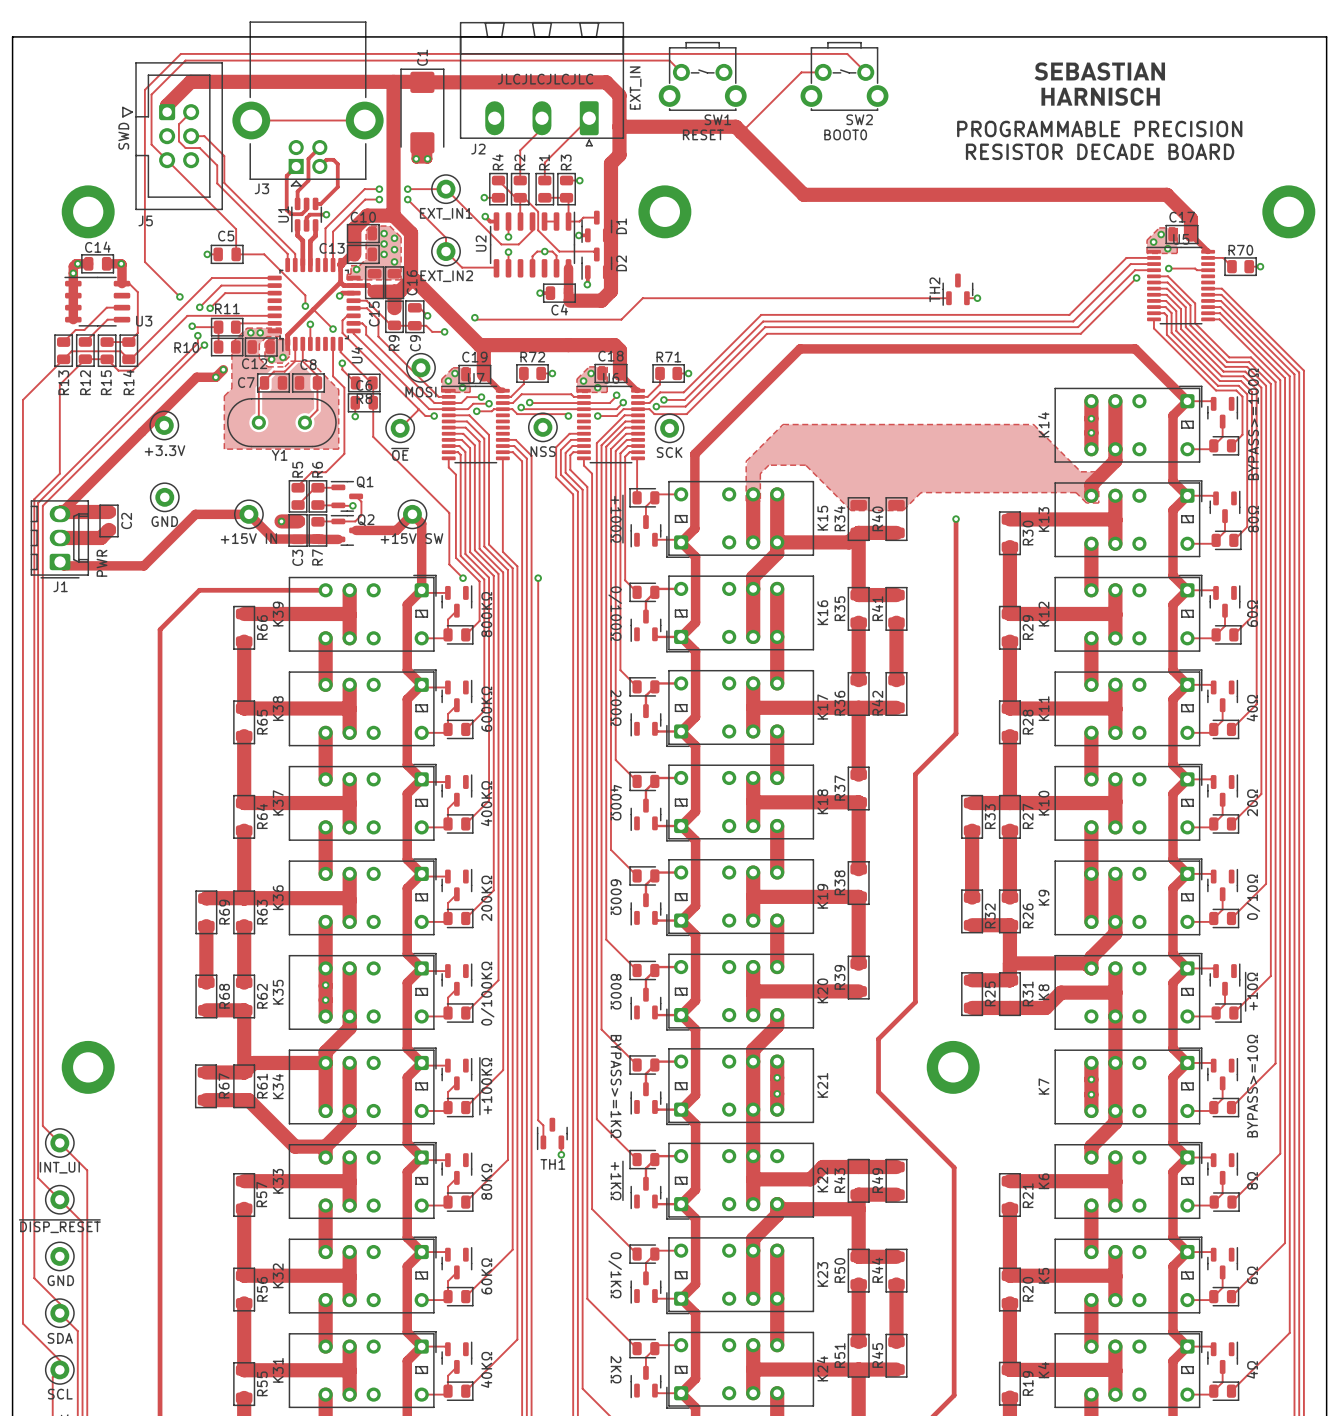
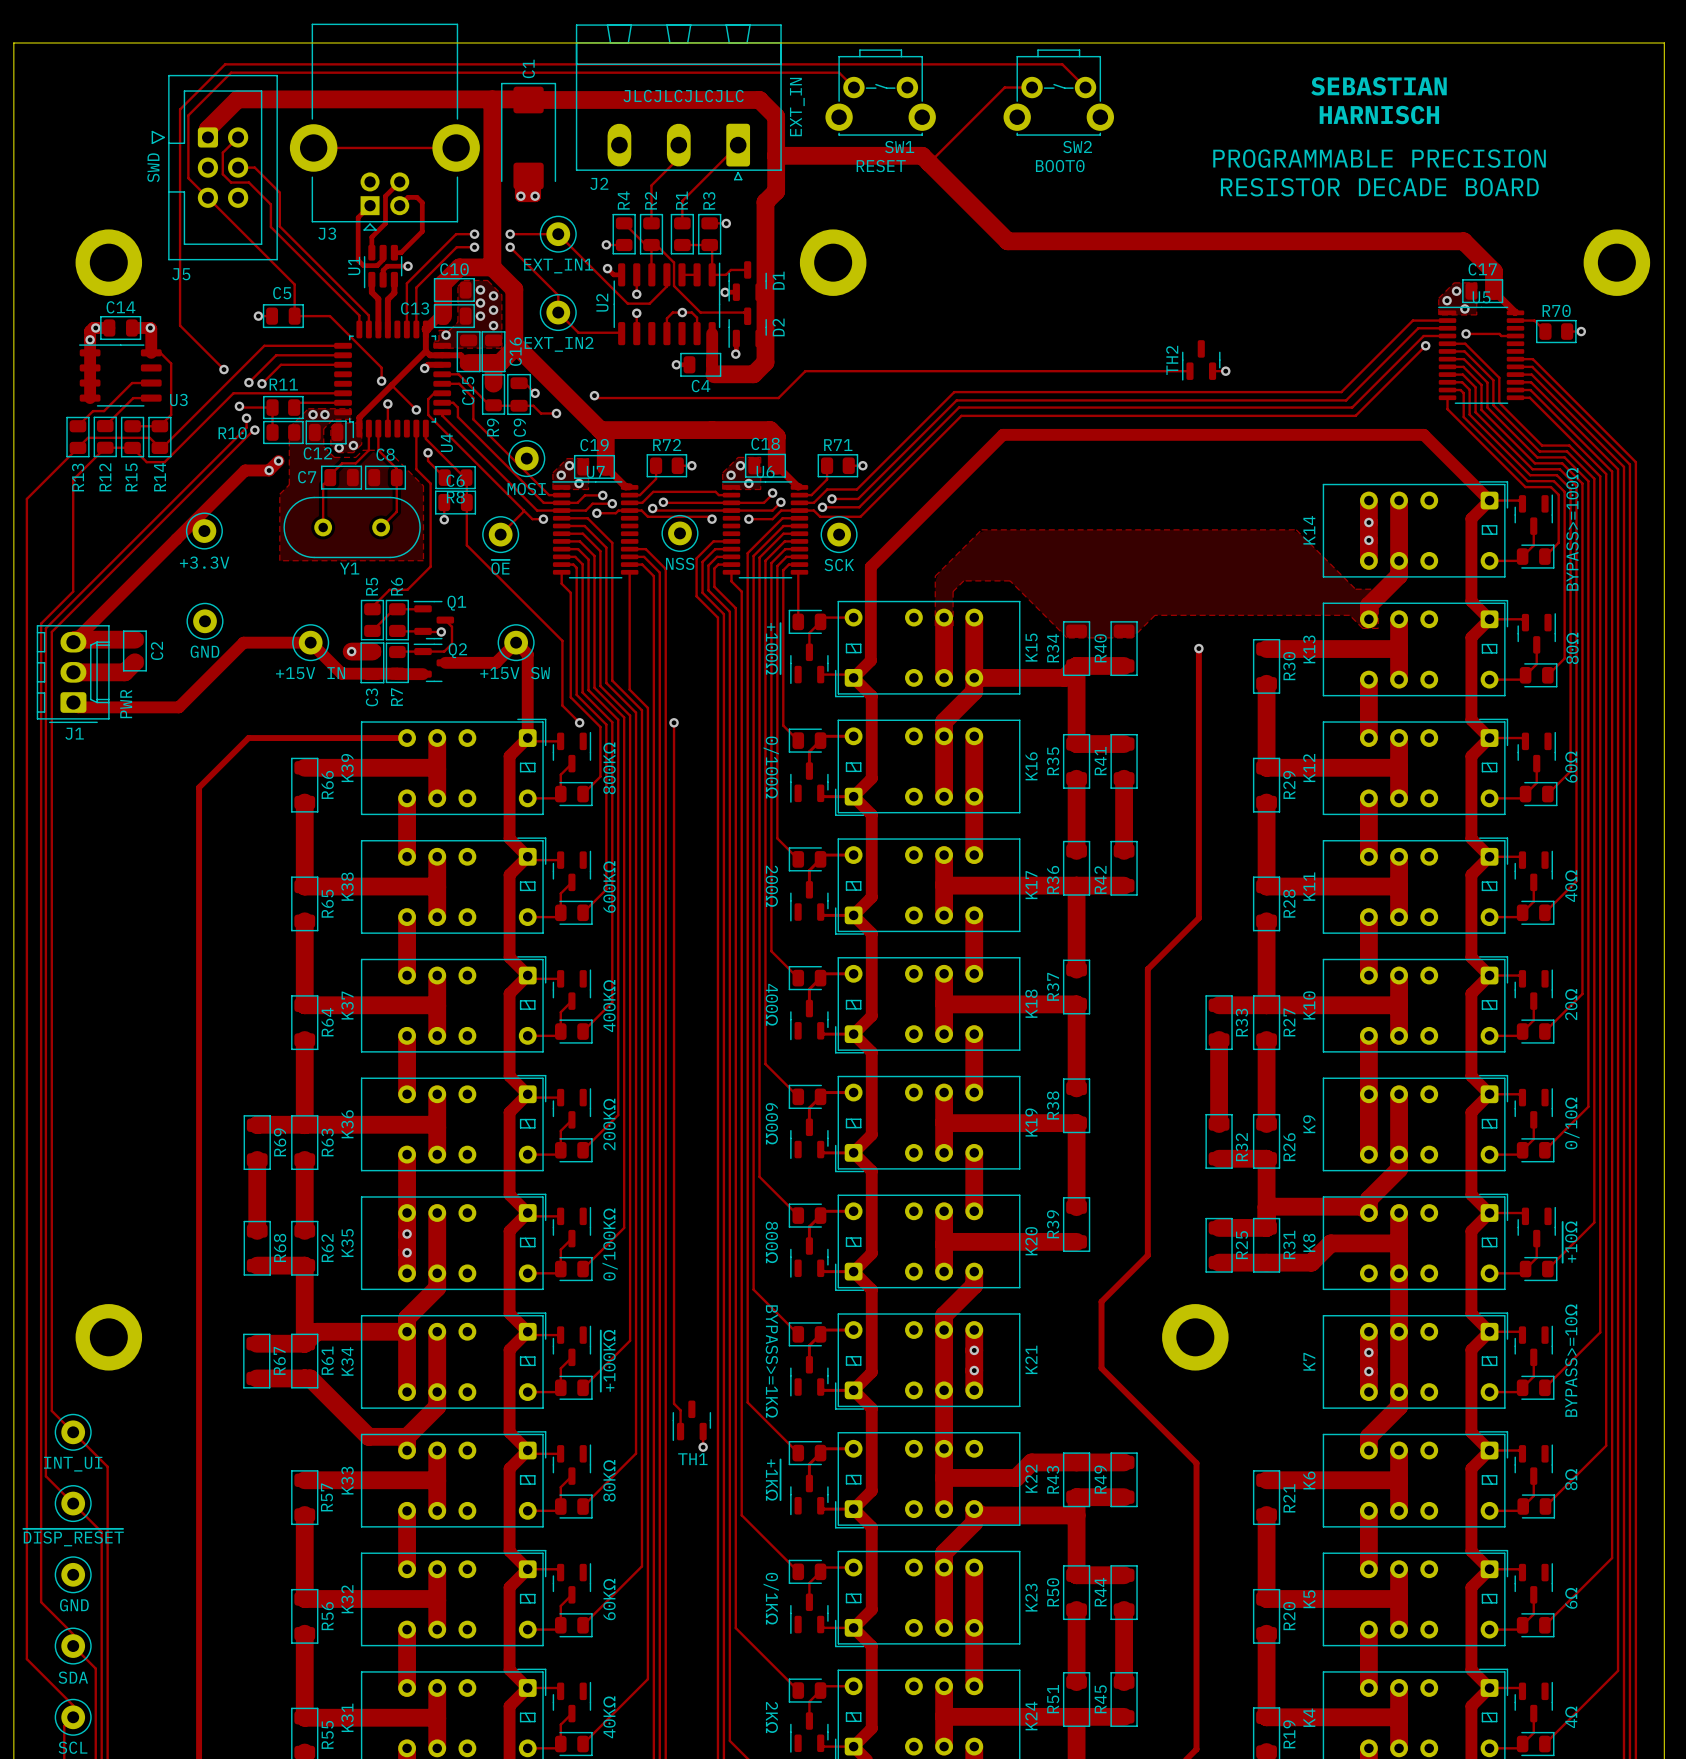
drawing: [1034, 62, 1166, 106] -> none
text: none -> SEBASTIAN (1379, 86)
text: none -> HARNISCH (1379, 115)

